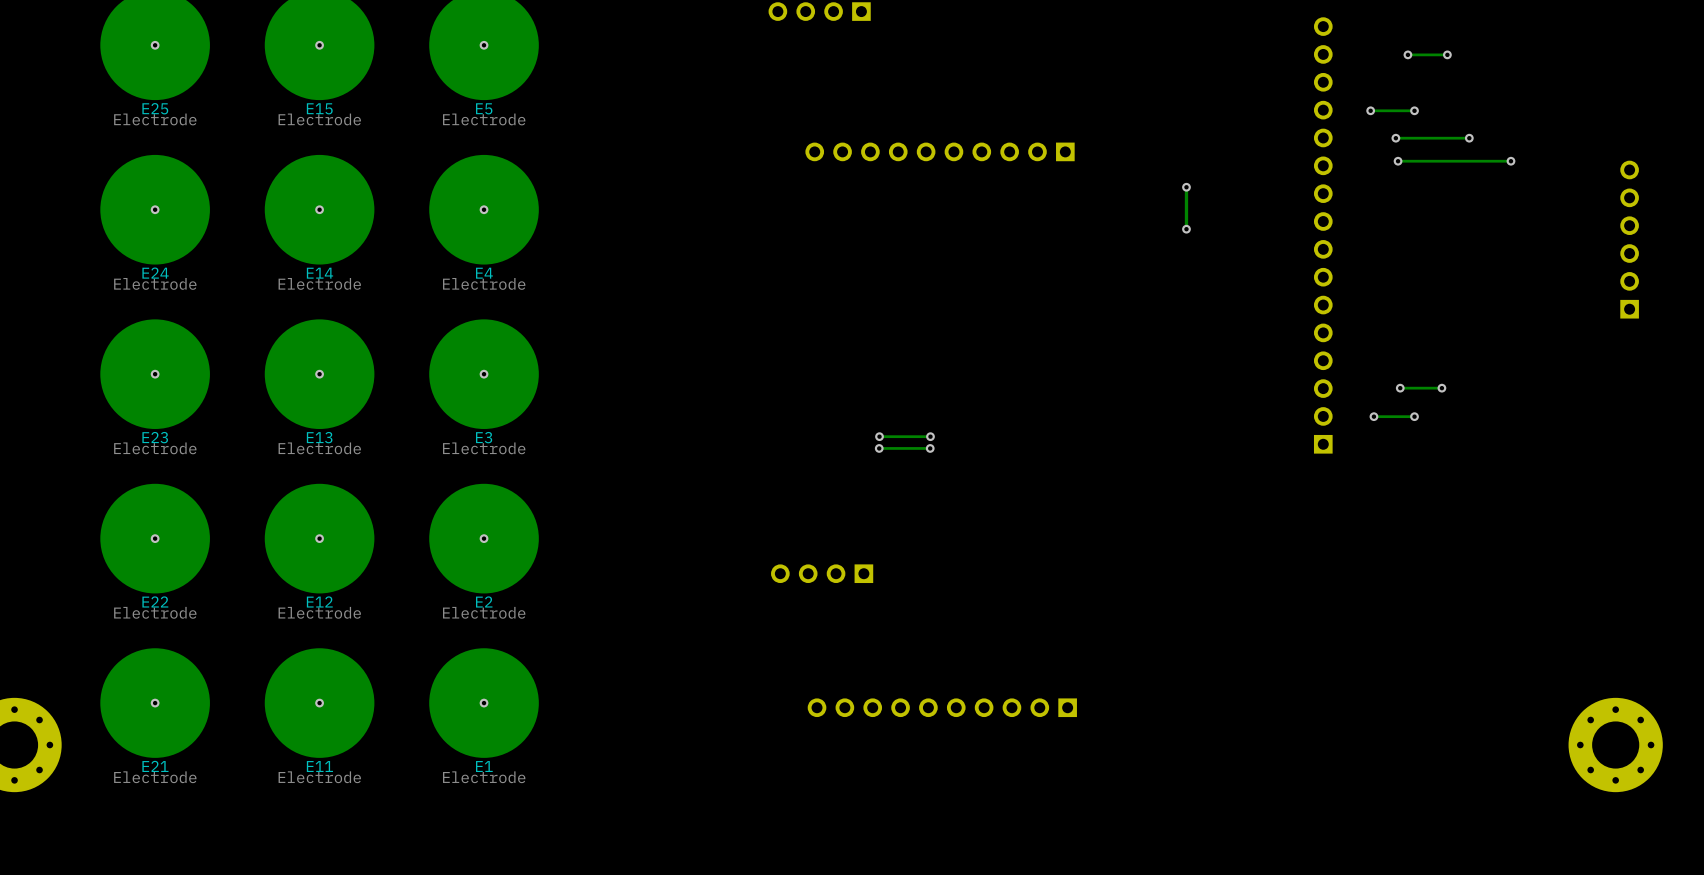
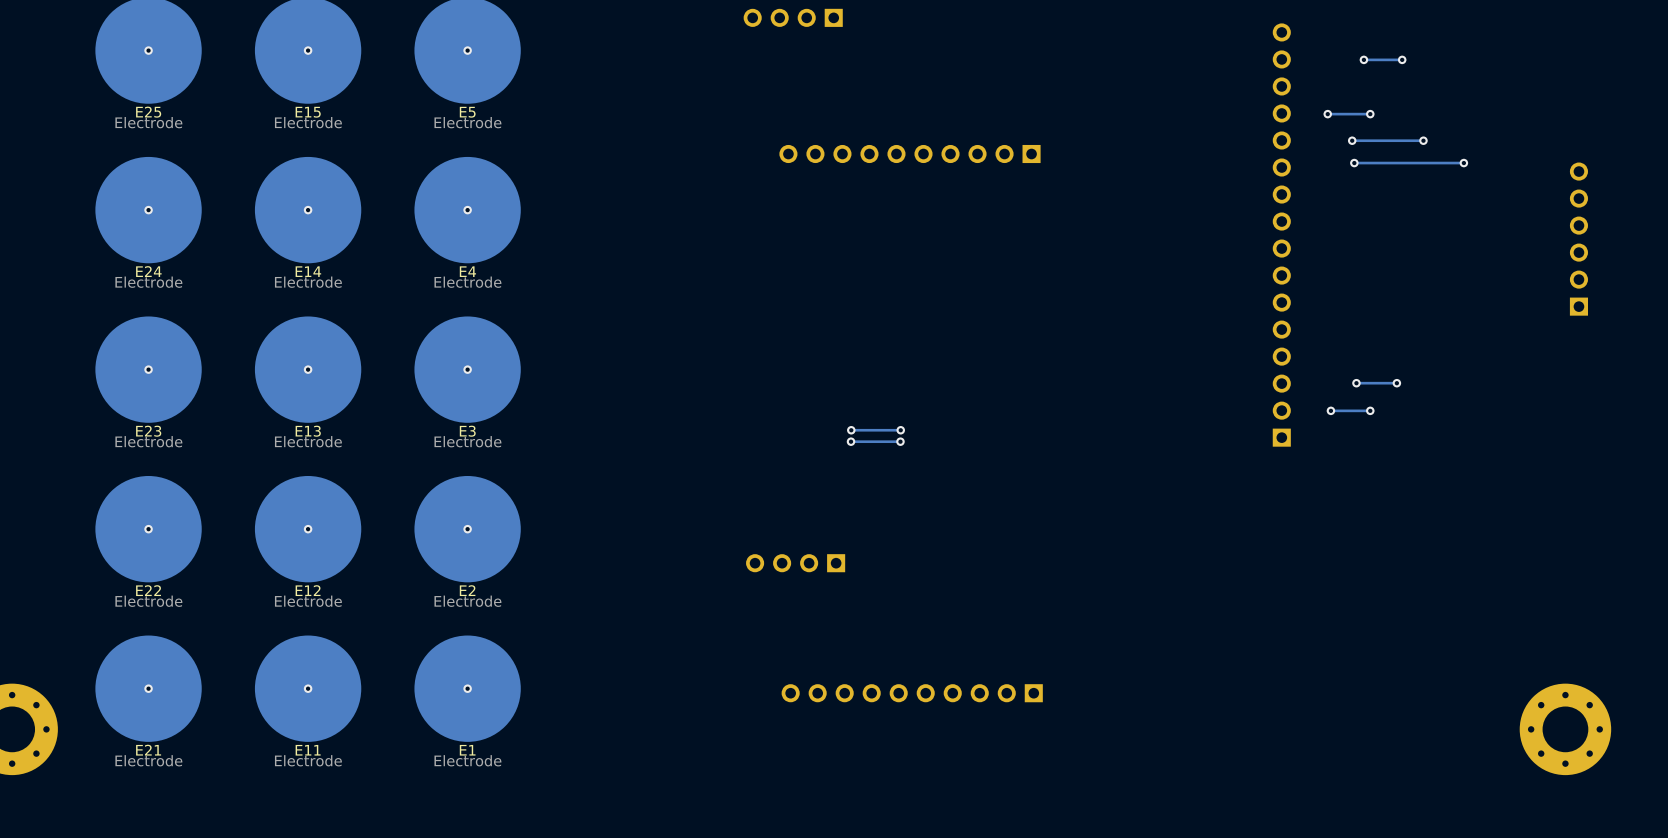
track: (1186, 187) (1186, 229) -> none
via: (1186, 187) -> none
via: (1186, 229) -> none

